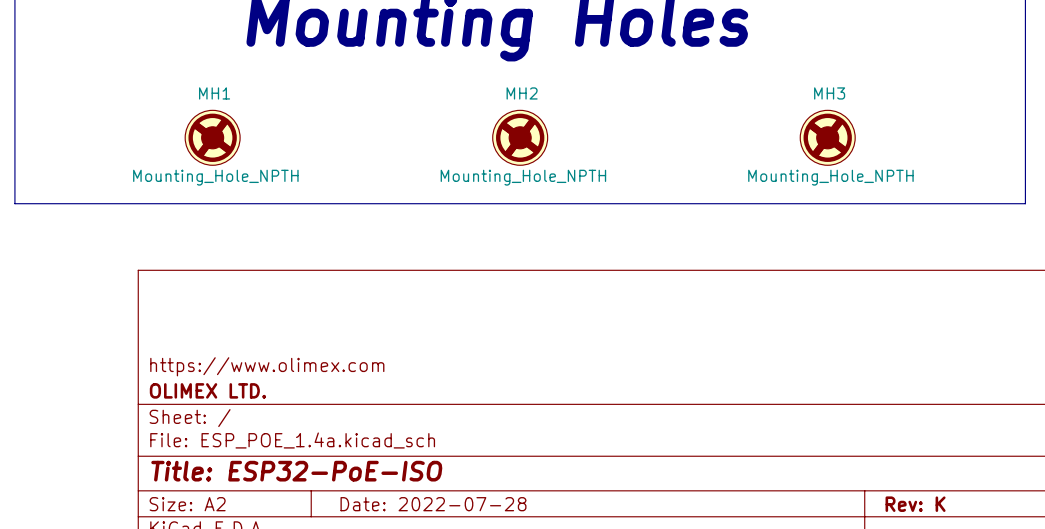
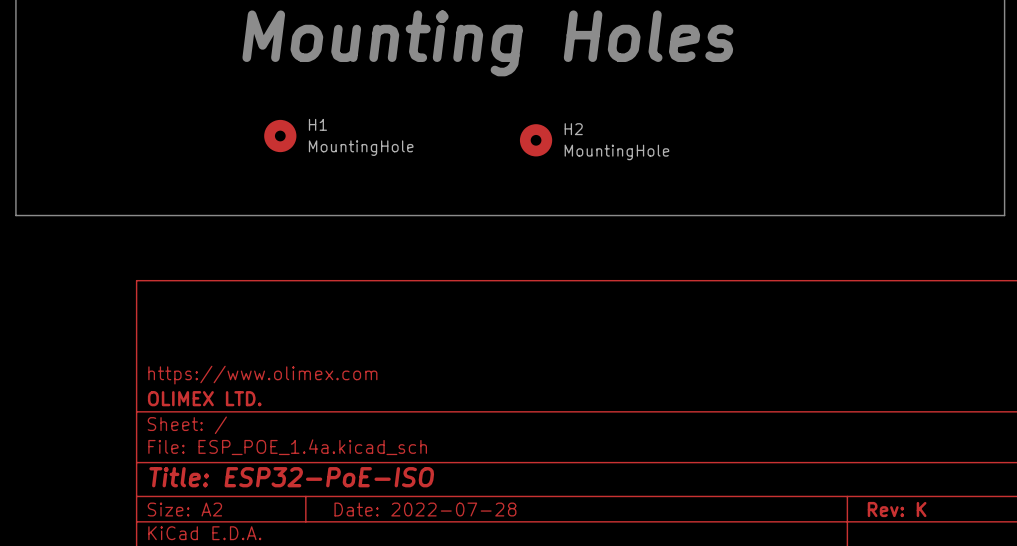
H1: none -> MountingHole (280, 136)
H2: none -> MountingHole (536, 140)
MH1: Mounting_Hole_NPTH (212, 137) -> none
MH2: Mounting_Hole_NPTH (520, 137) -> none
MH3: Mounting_Hole_NPTH (827, 137) -> none

